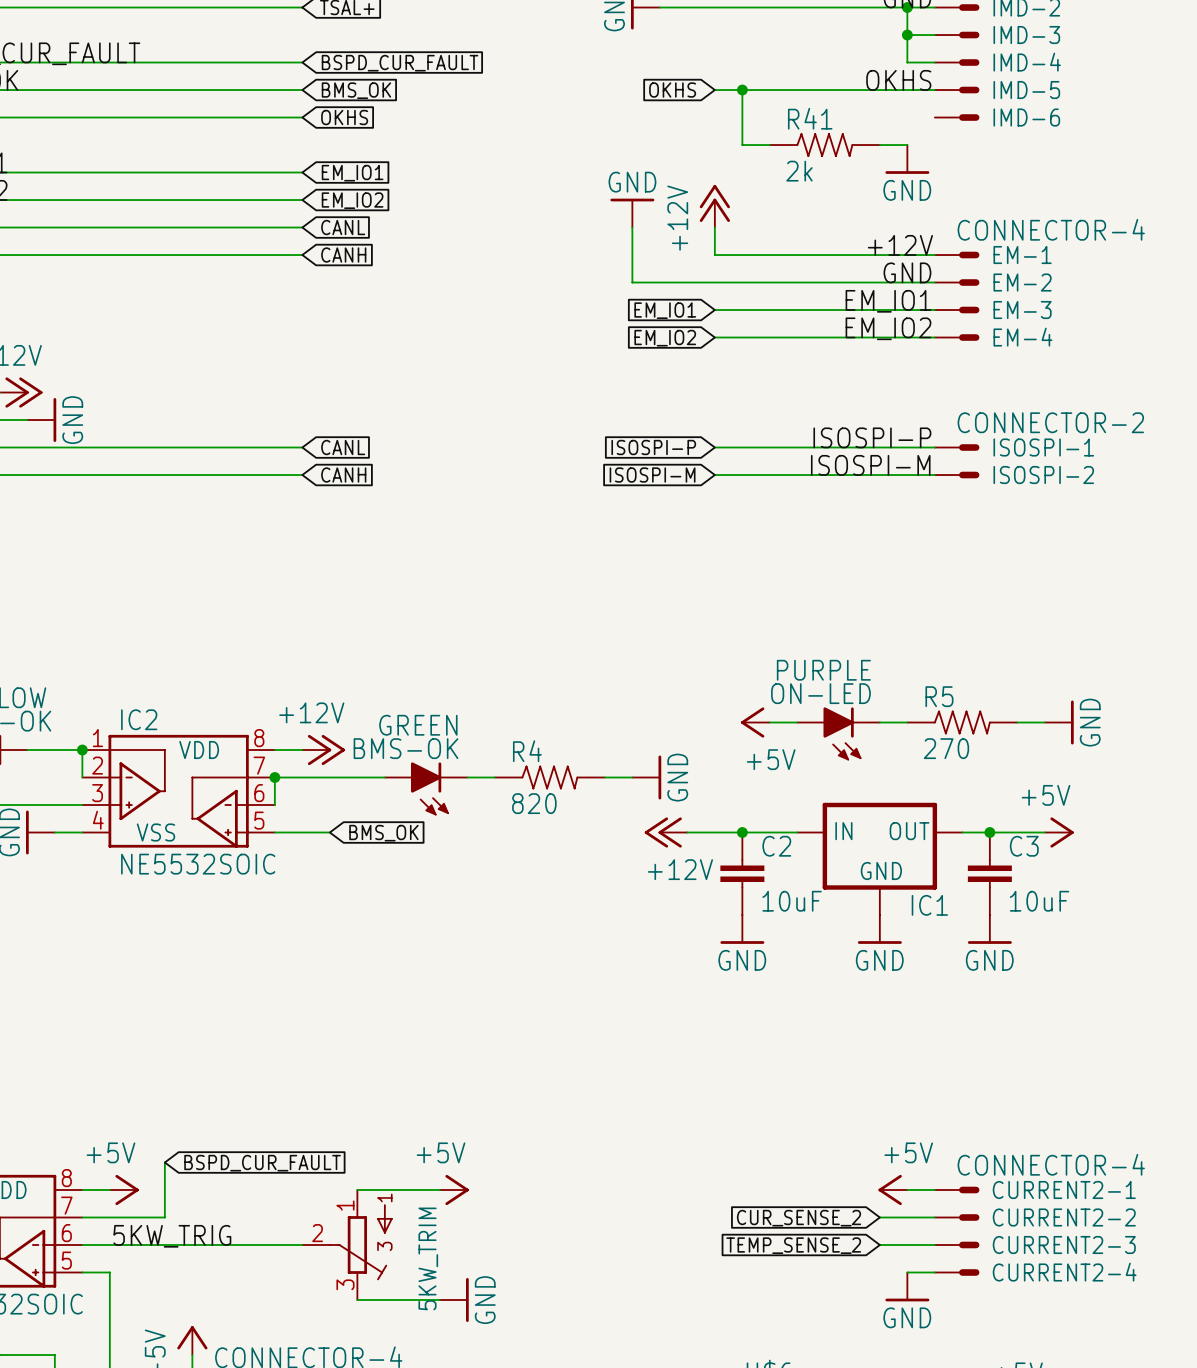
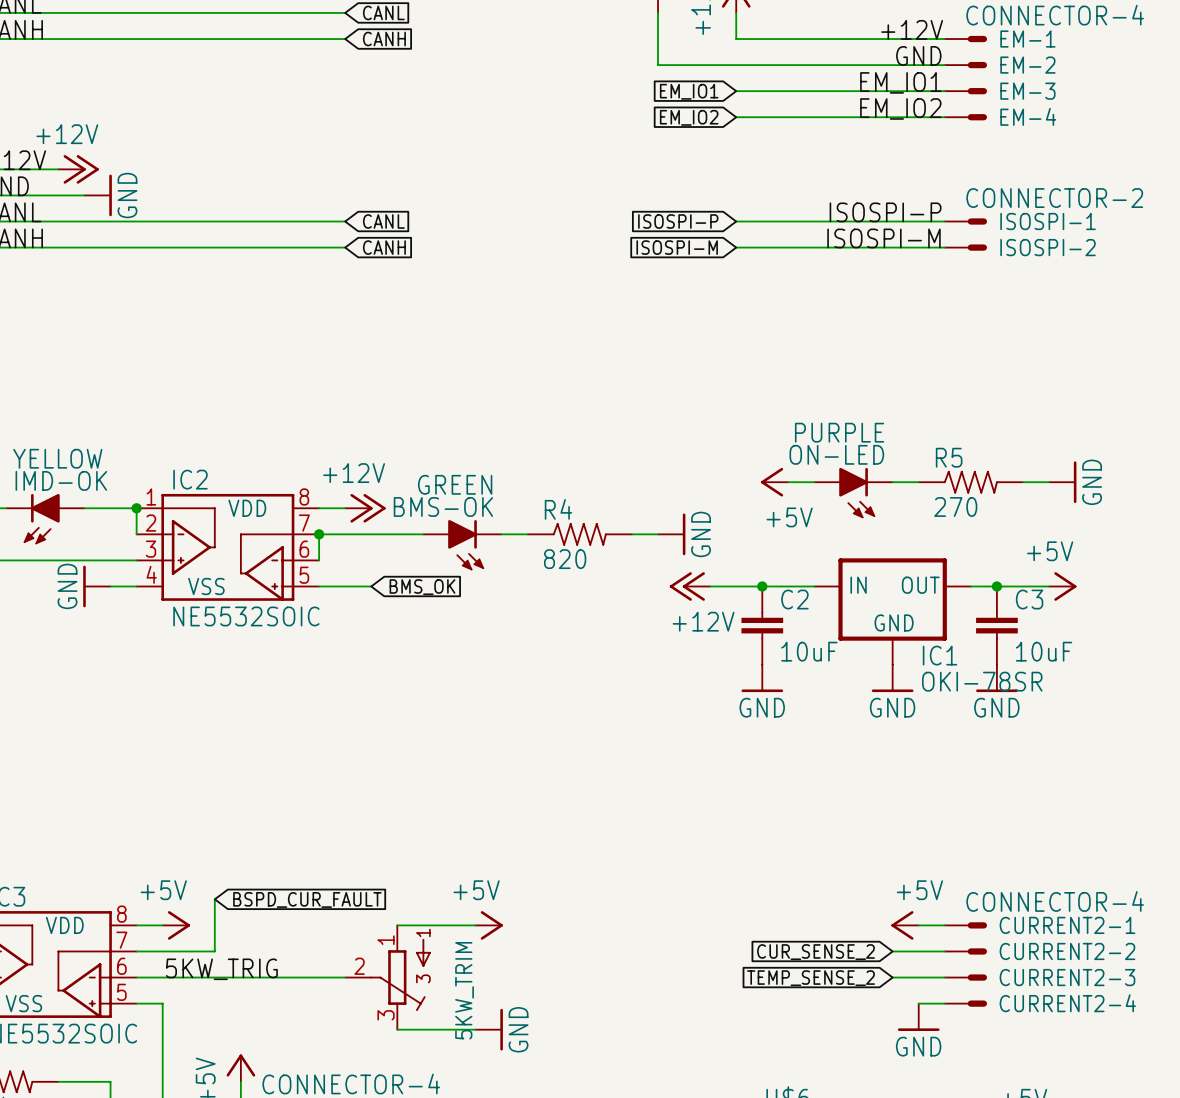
IC1 value: none -> OKI-78SR (982, 681)

